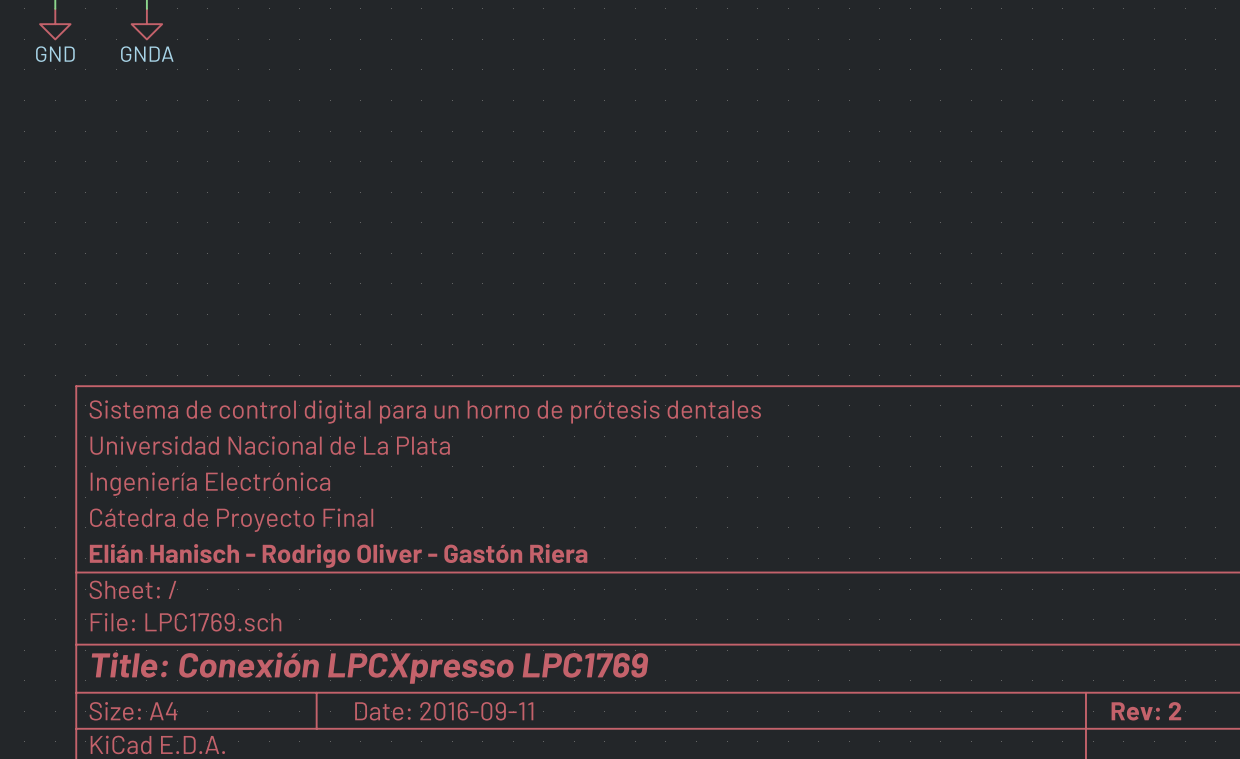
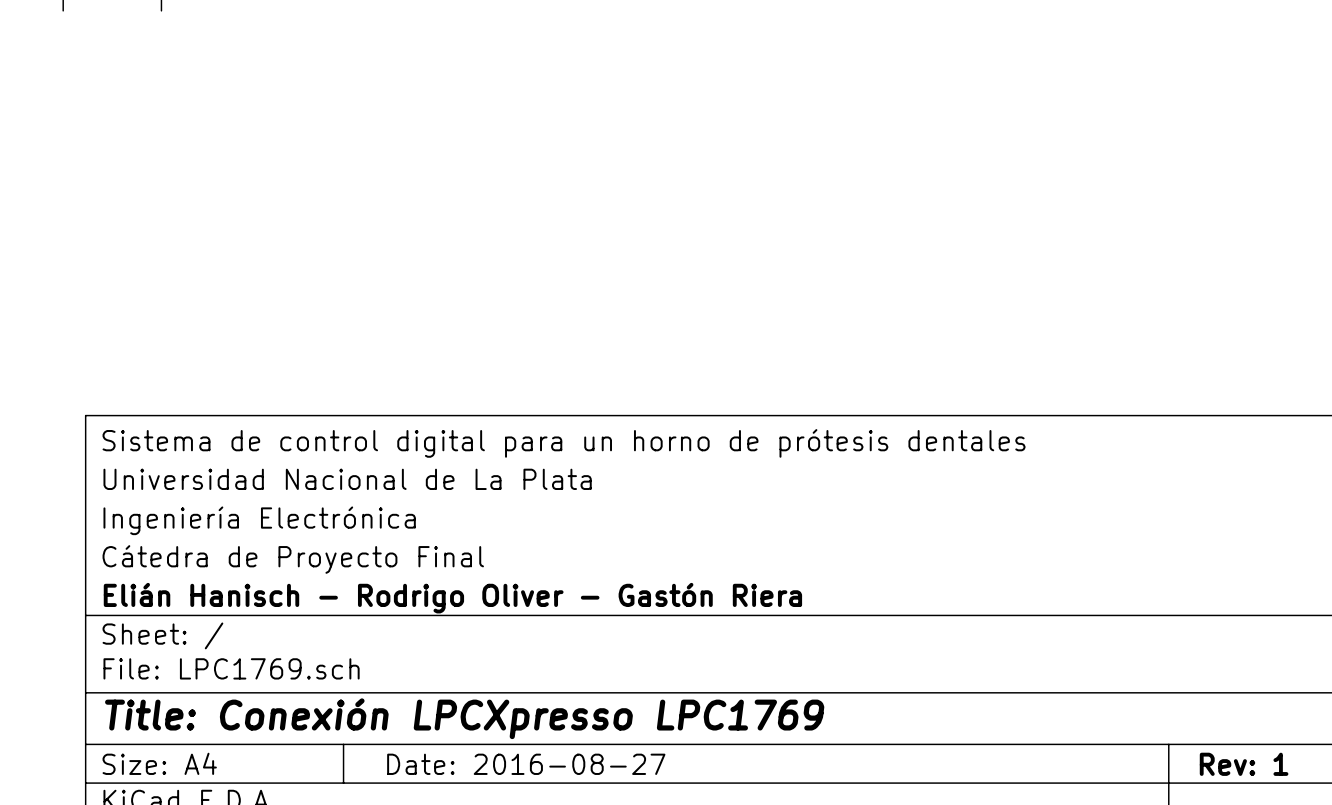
power symbol: GND (55, 24) -> none
power symbol: GNDA (146, 24) -> none
title block: Date: 2016-09-11 (444, 711) -> Date: 2016-08-27 (526, 764)
title block: Rev: 2 (1146, 711) -> Rev: 1 (1244, 764)

